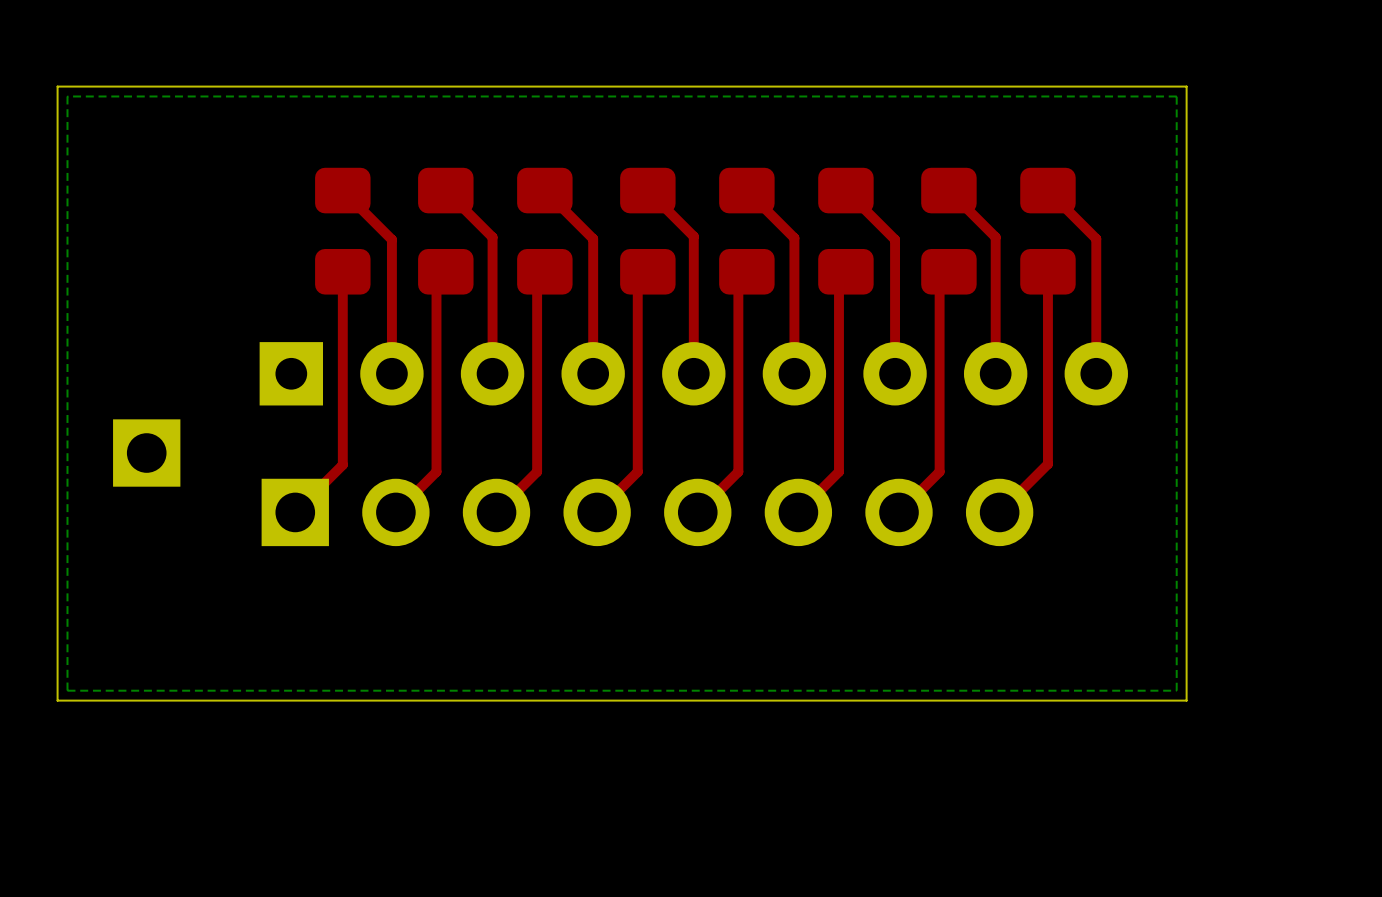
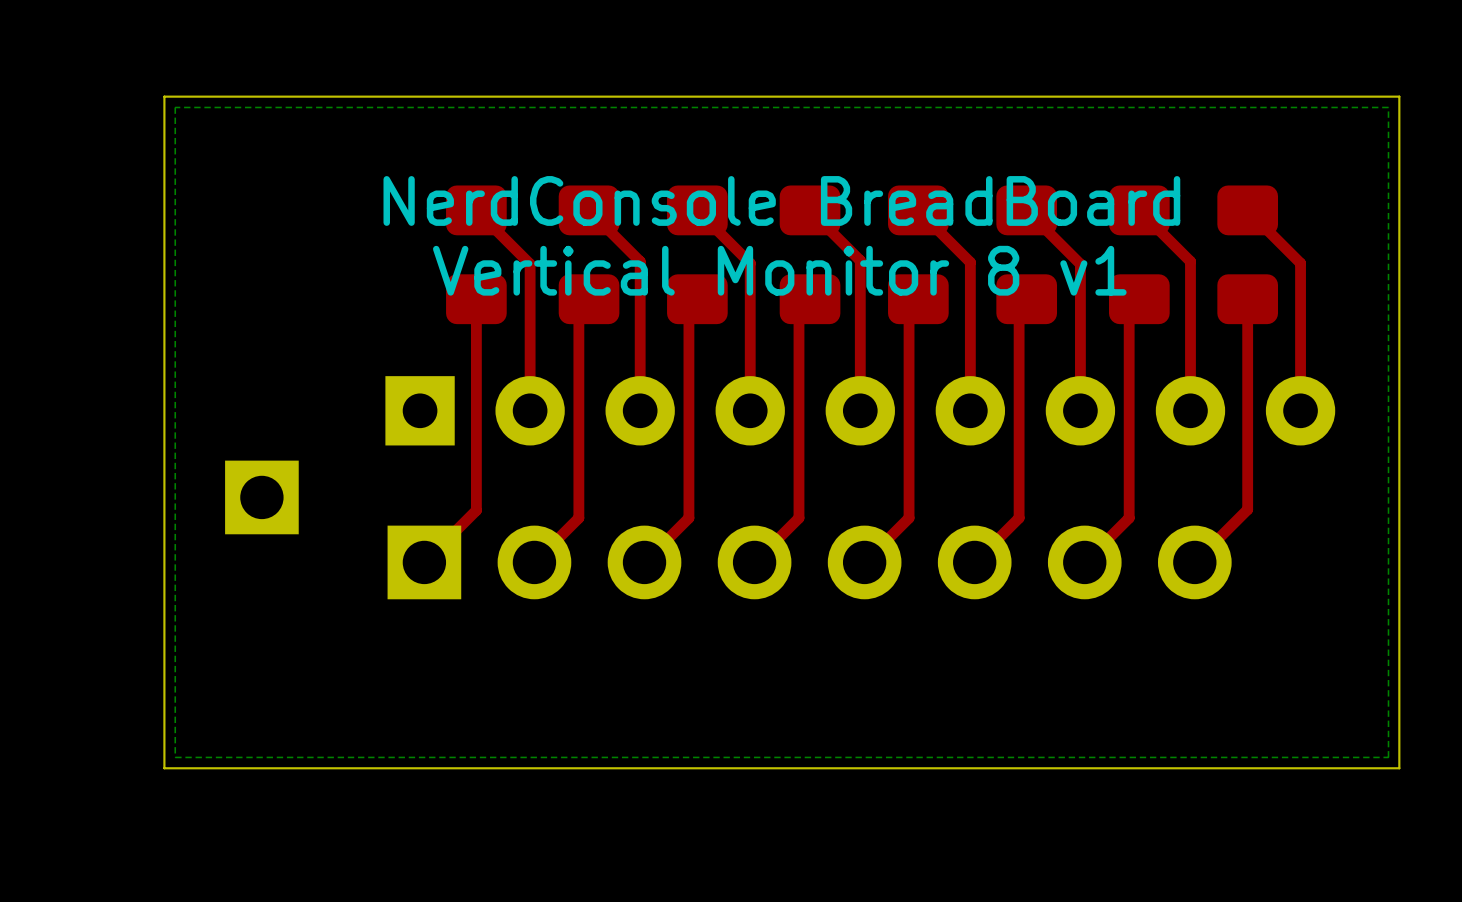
text: none -> NerdConsole BreadBoard (781, 200)
text: none -> Vertical Monitor 8 v1 (779, 270)

